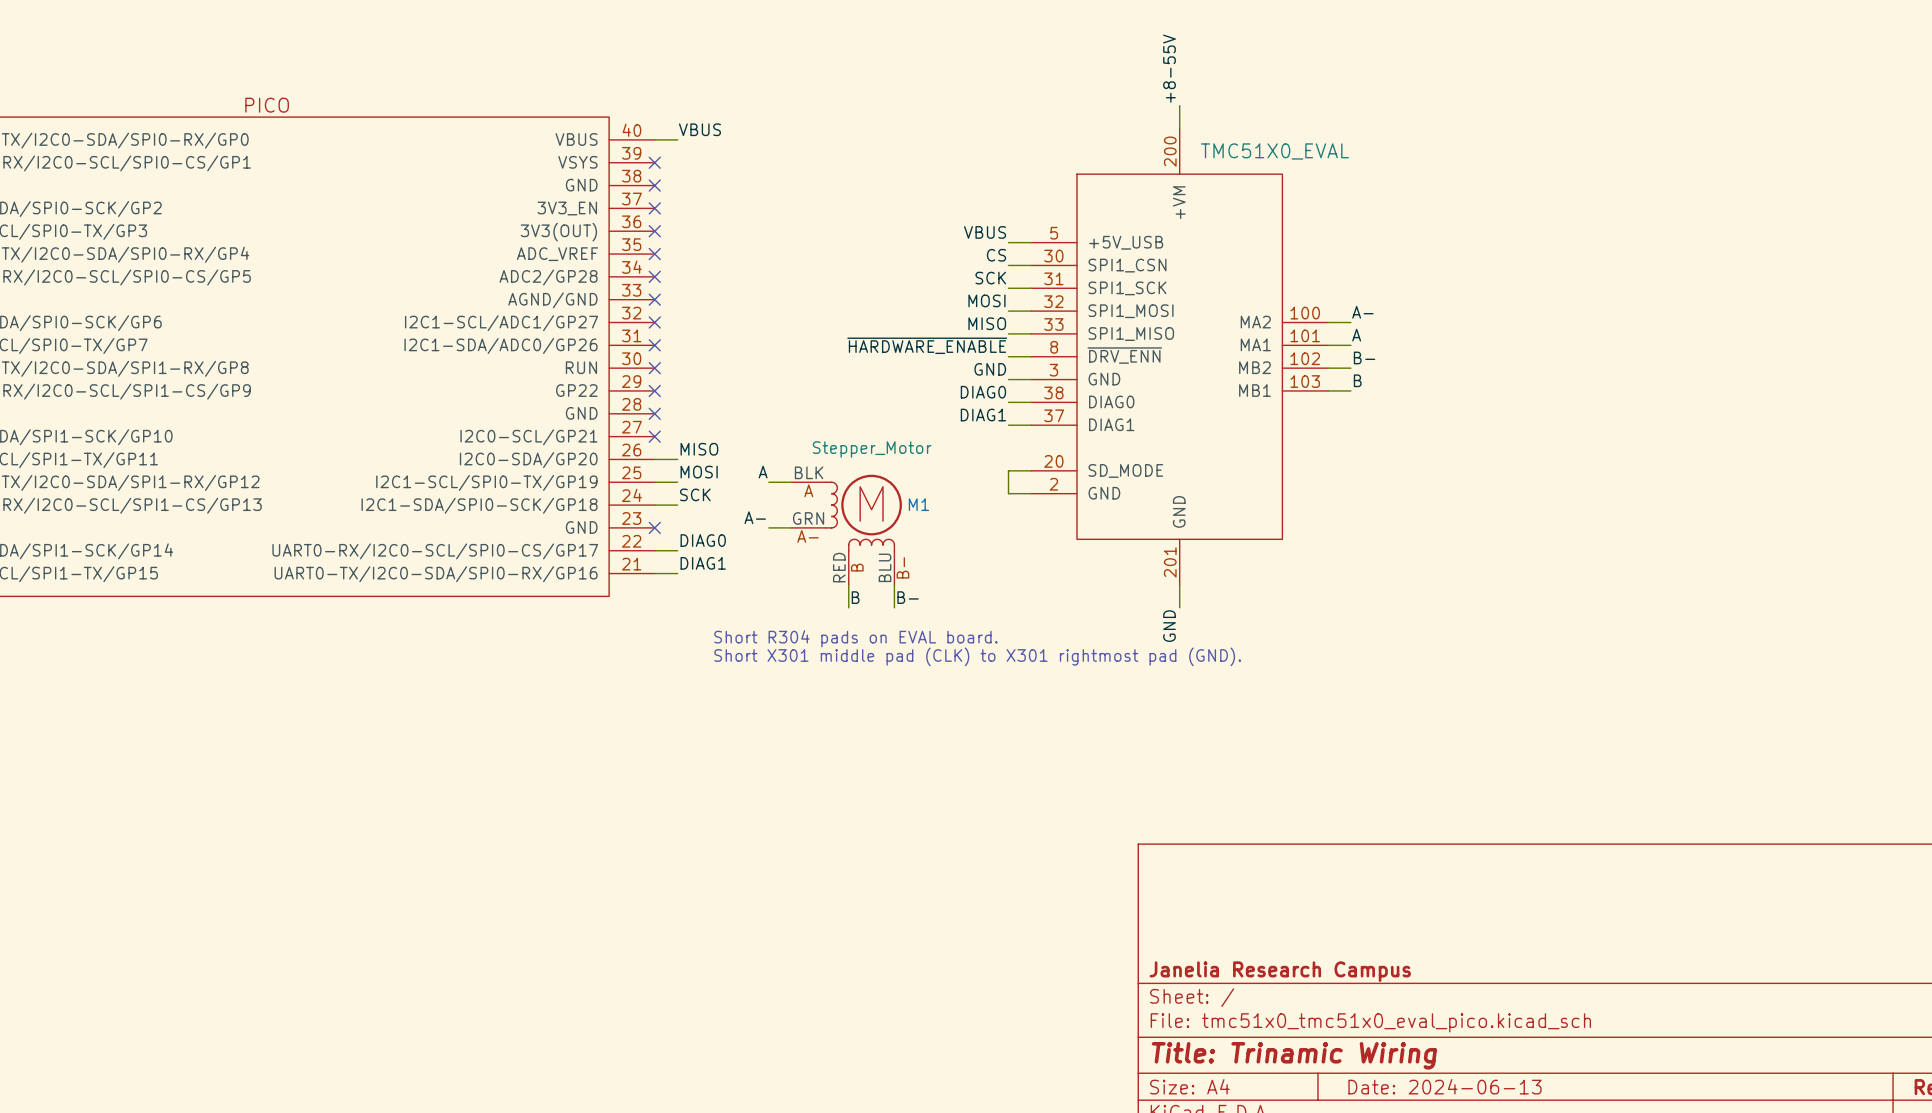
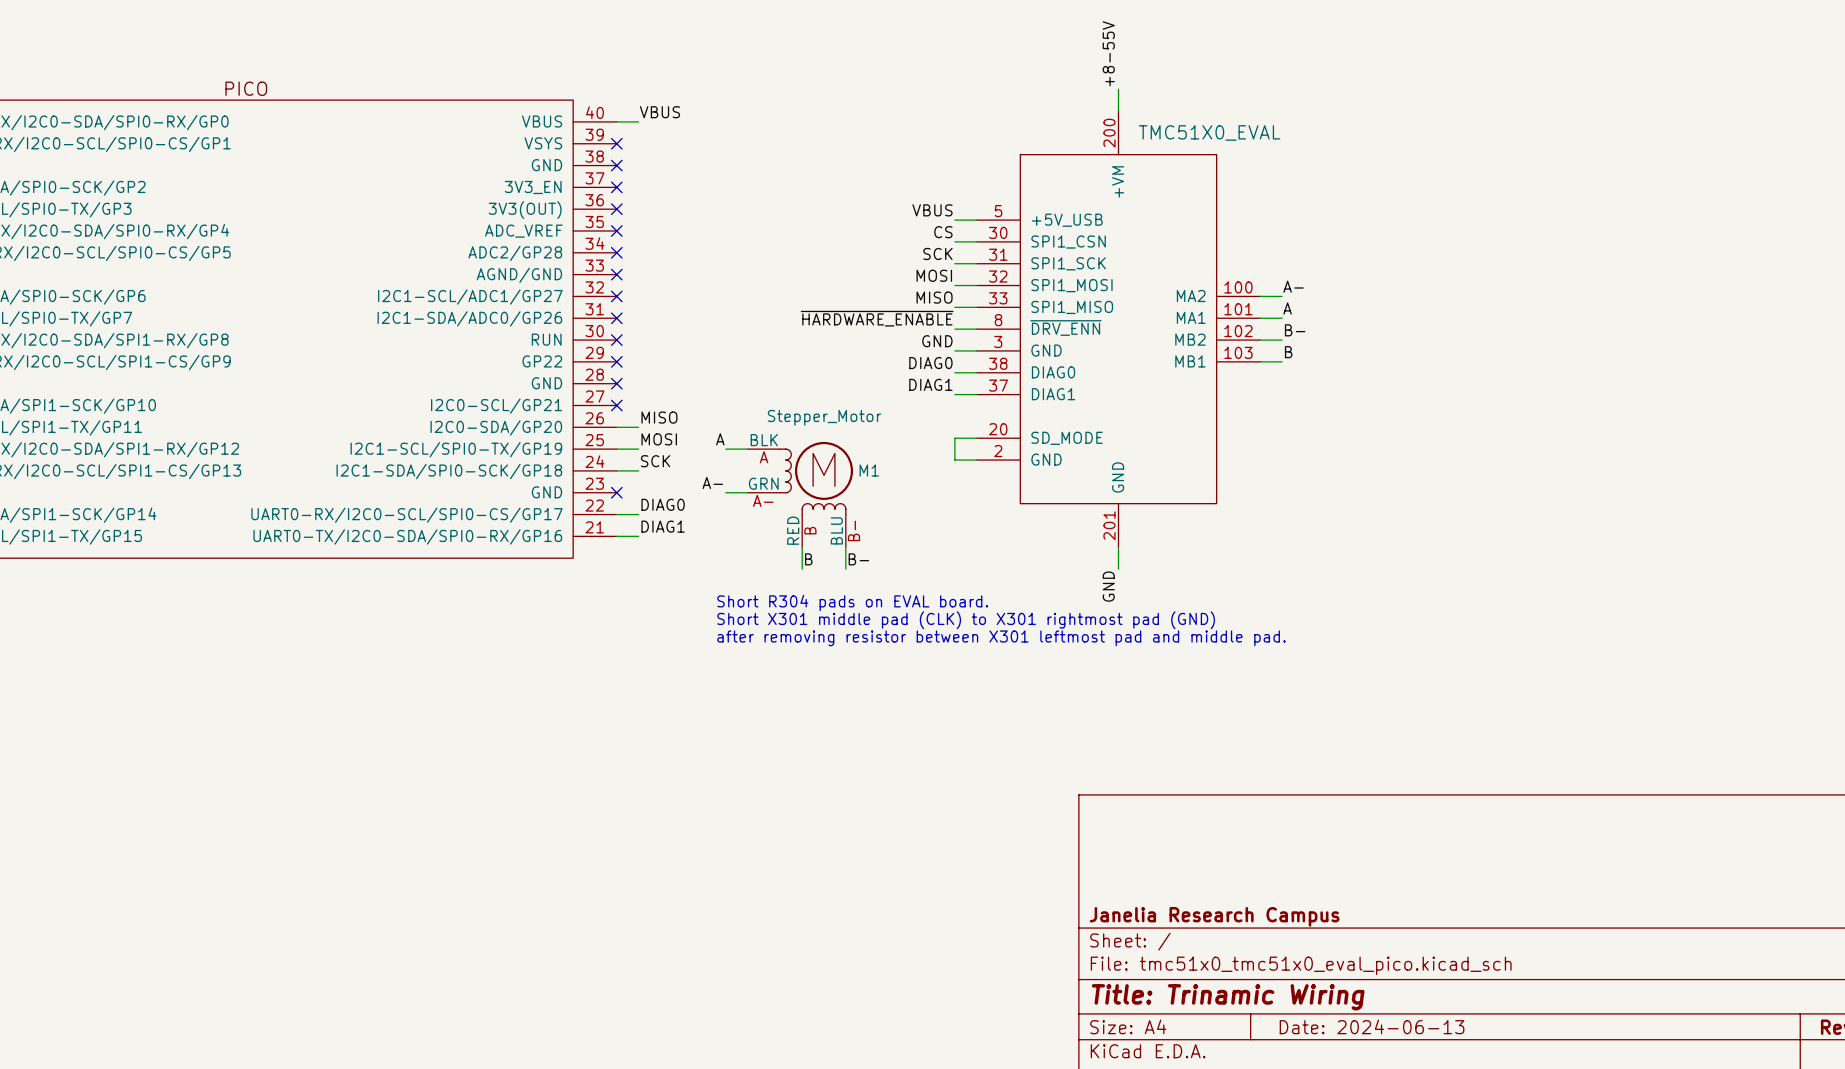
text position: Short R304 pads on EVAL board. (855, 638) -> Short R304 pads on EVAL board. (852, 602)
text: Short X301 middle pad (CLK) to X301 rightmost pad (GND). (977, 656) -> Short X301 middle pad (CLK) to X301 rightmost pad (GND) (966, 620)
text: none -> after removing resistor between X301 leftmost pad and middle pad. (1001, 638)

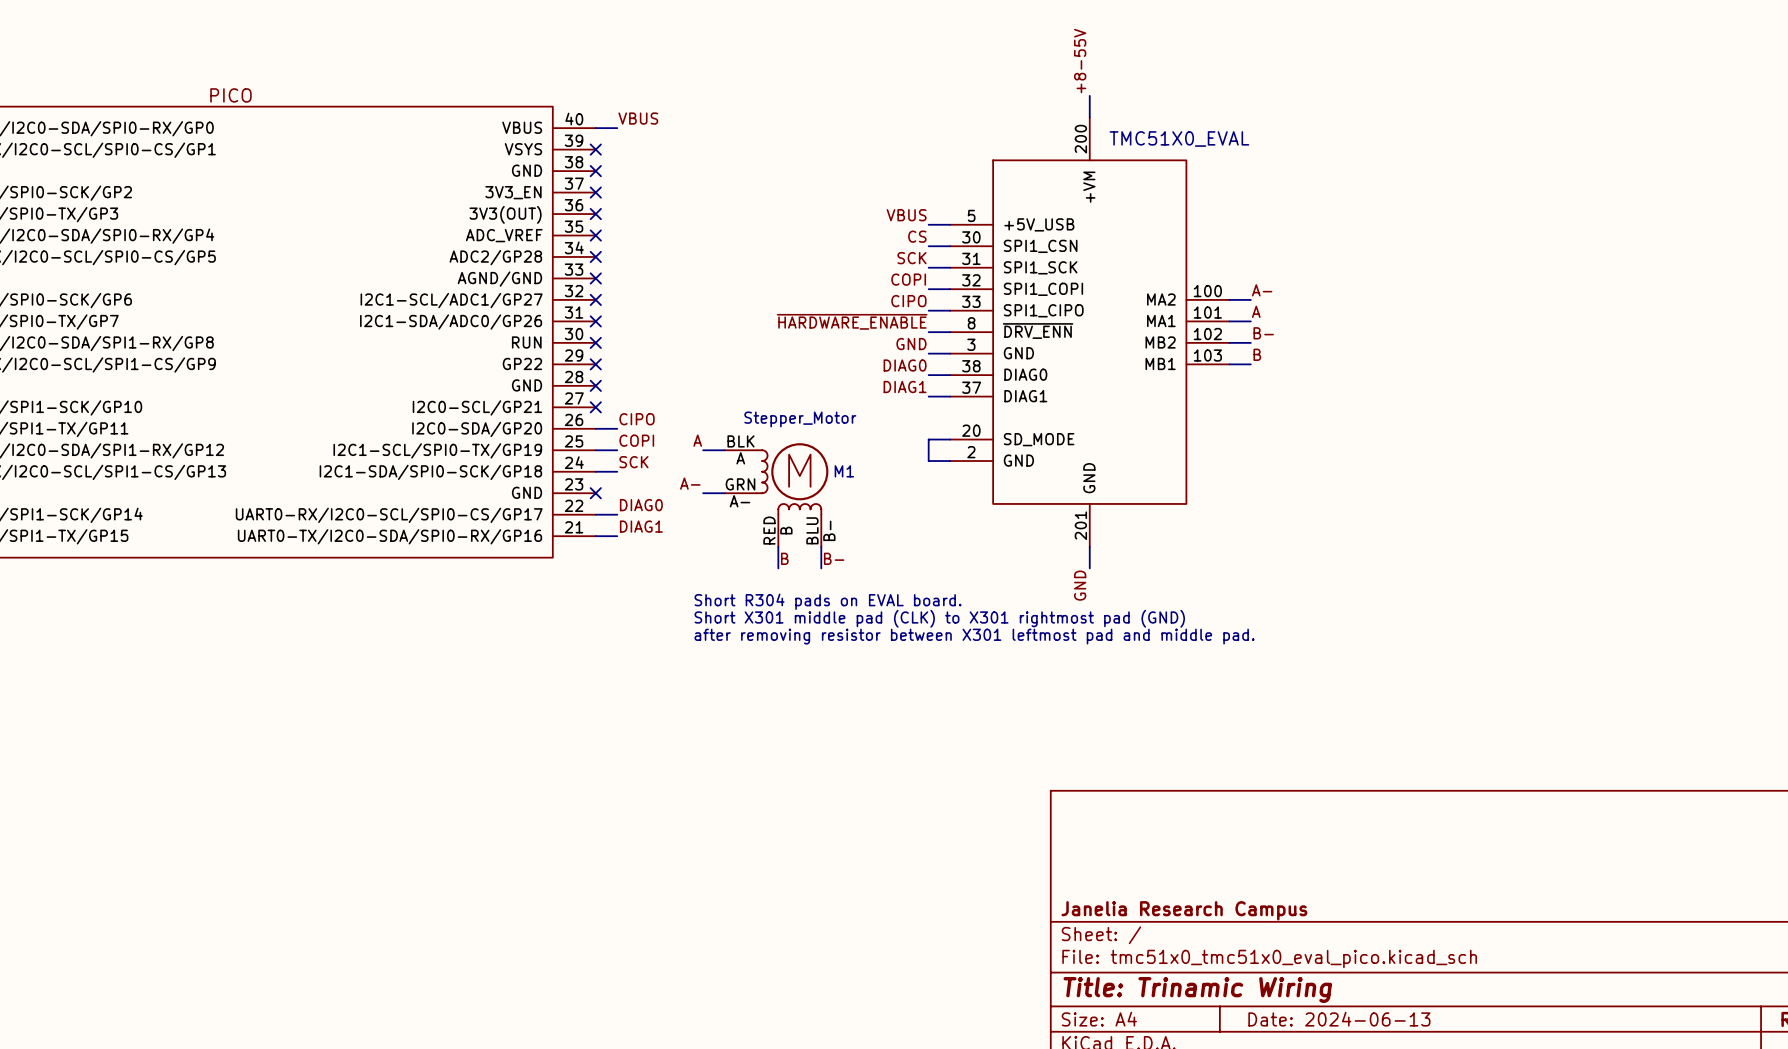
label: MOSI (934, 275) -> COPI (908, 279)
part pin name: SPI1_MOSI (1071, 285) -> SPI1_COPI (1043, 289)
label: MISO (934, 297) -> CIPO (908, 301)
part pin name: SPI1_MISO (1072, 307) -> SPI1_CIPO (1043, 310)
label: MISO (659, 417) -> CIPO (637, 419)
label: MOSI (659, 439) -> COPI (636, 440)

